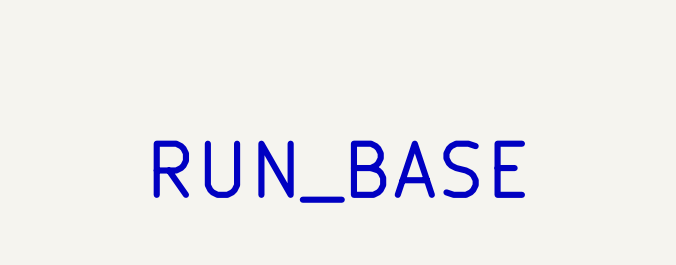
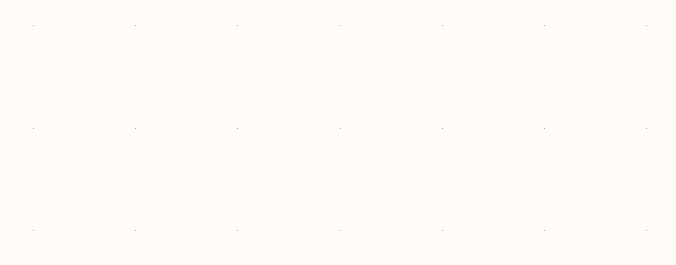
text: RUN_BASE (339, 171) -> none

